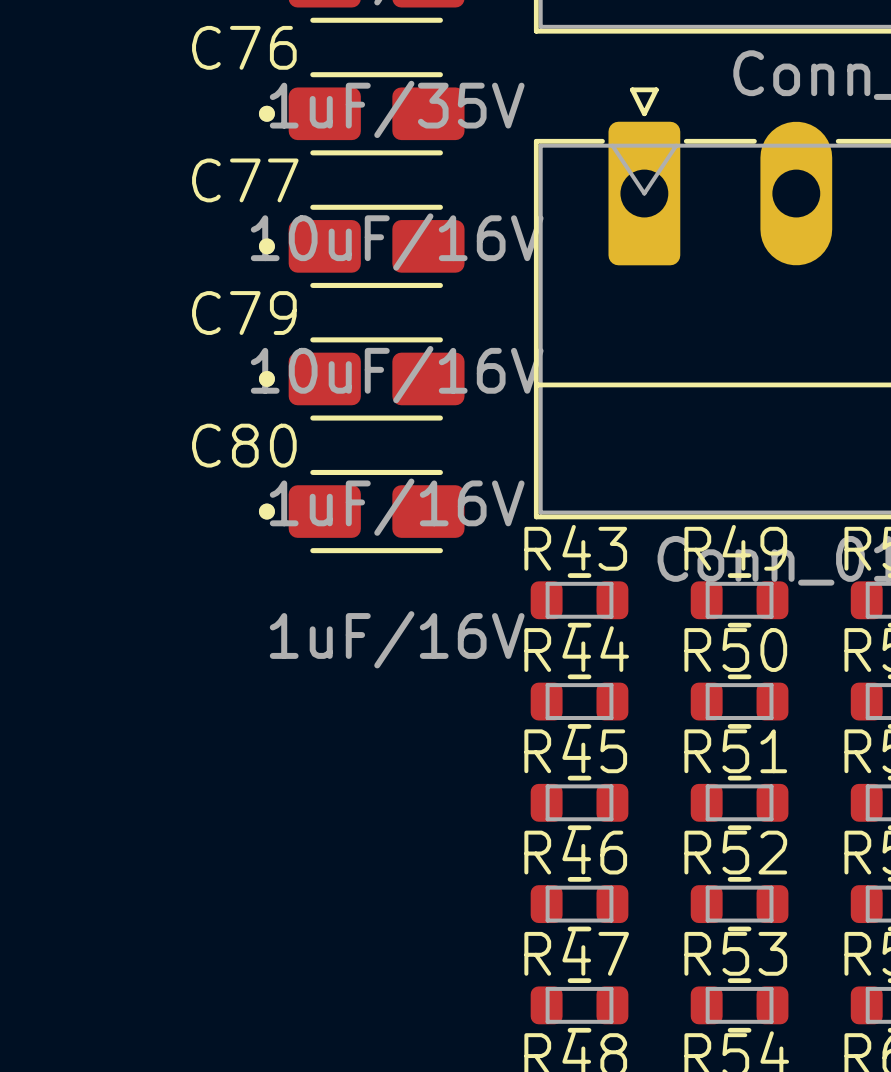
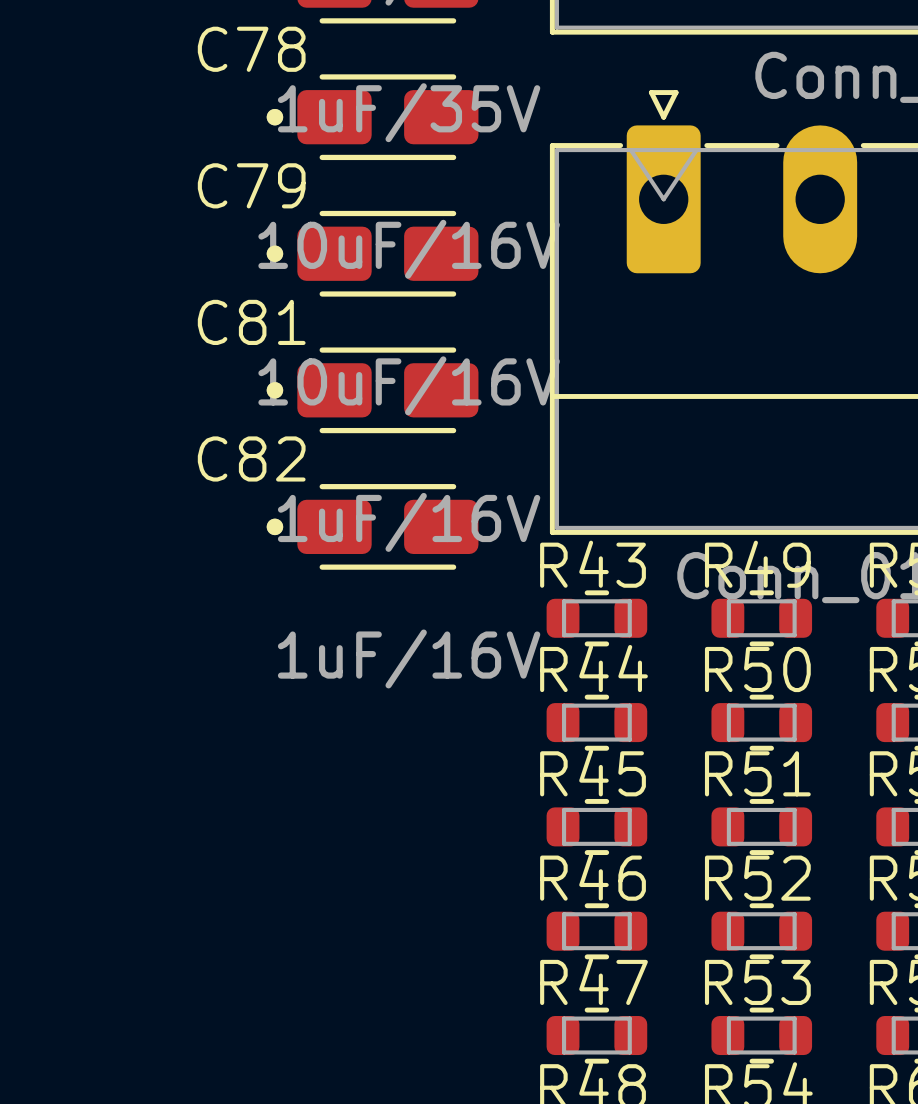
C76 name: C76 (244, 47) -> C78 (251, 49)
C77 name: C77 (245, 180) -> C79 (251, 185)
C79 name: C79 (244, 313) -> C81 (251, 322)
C80 name: C80 (244, 445) -> C82 (251, 458)

